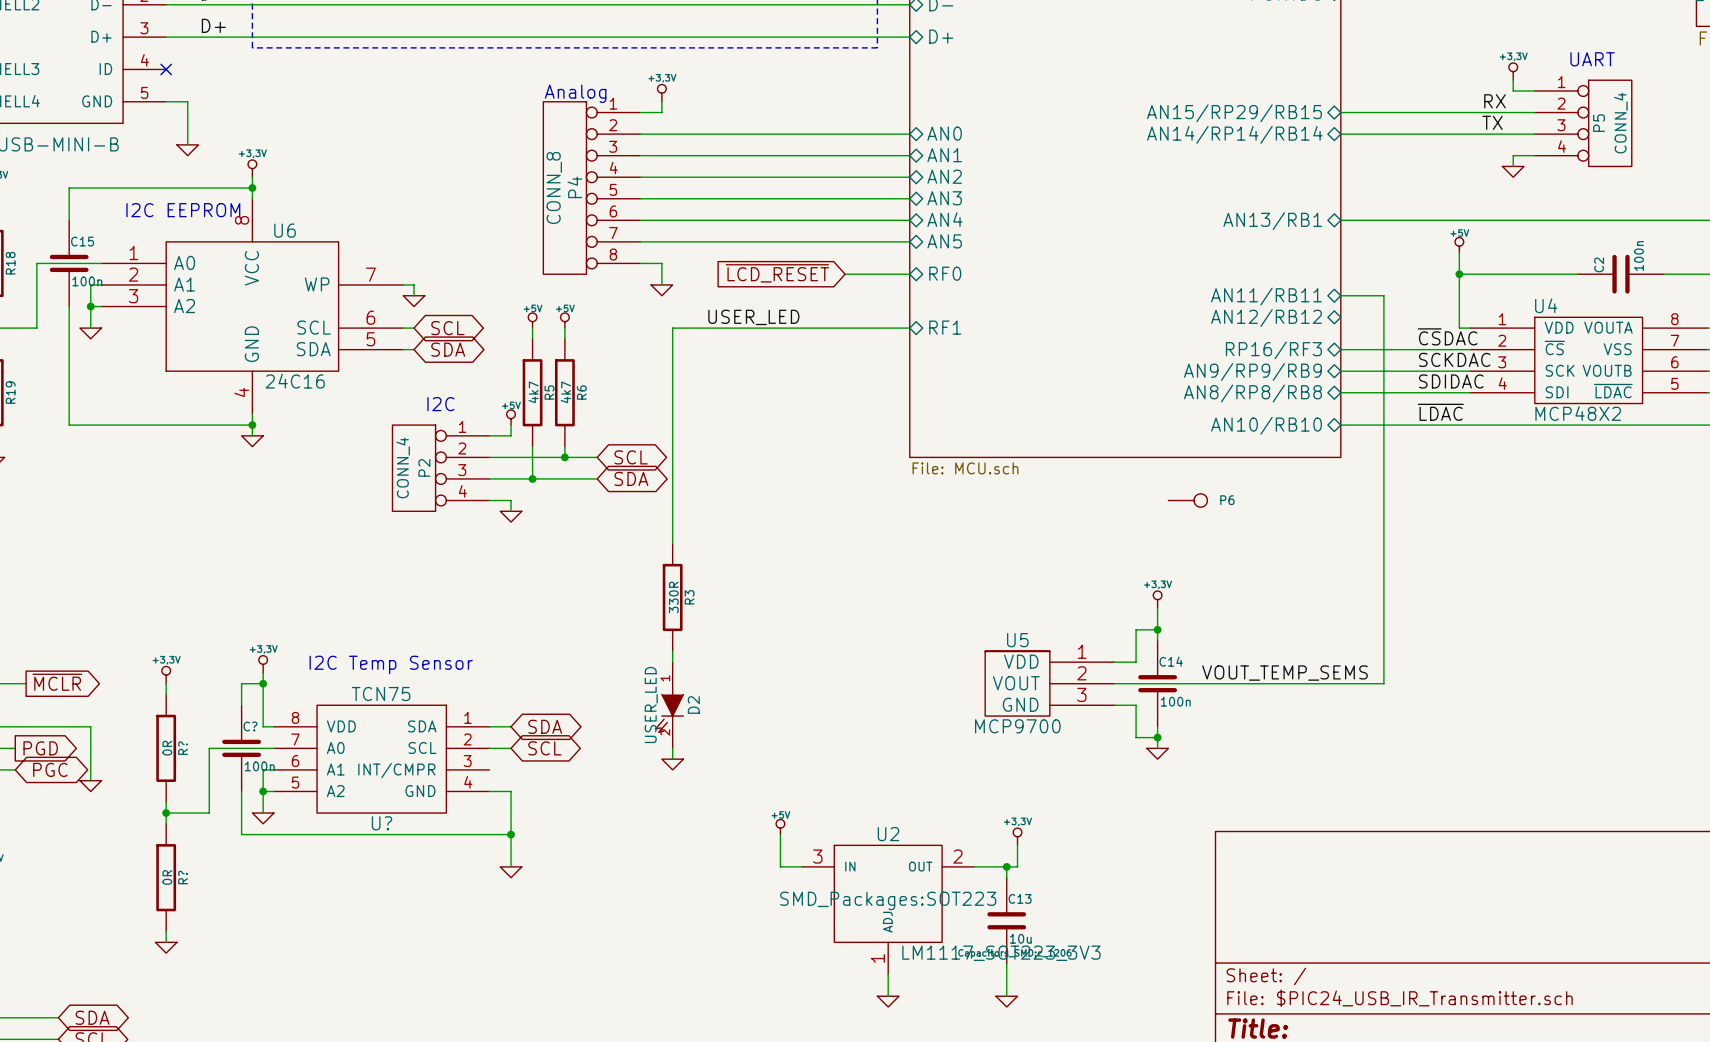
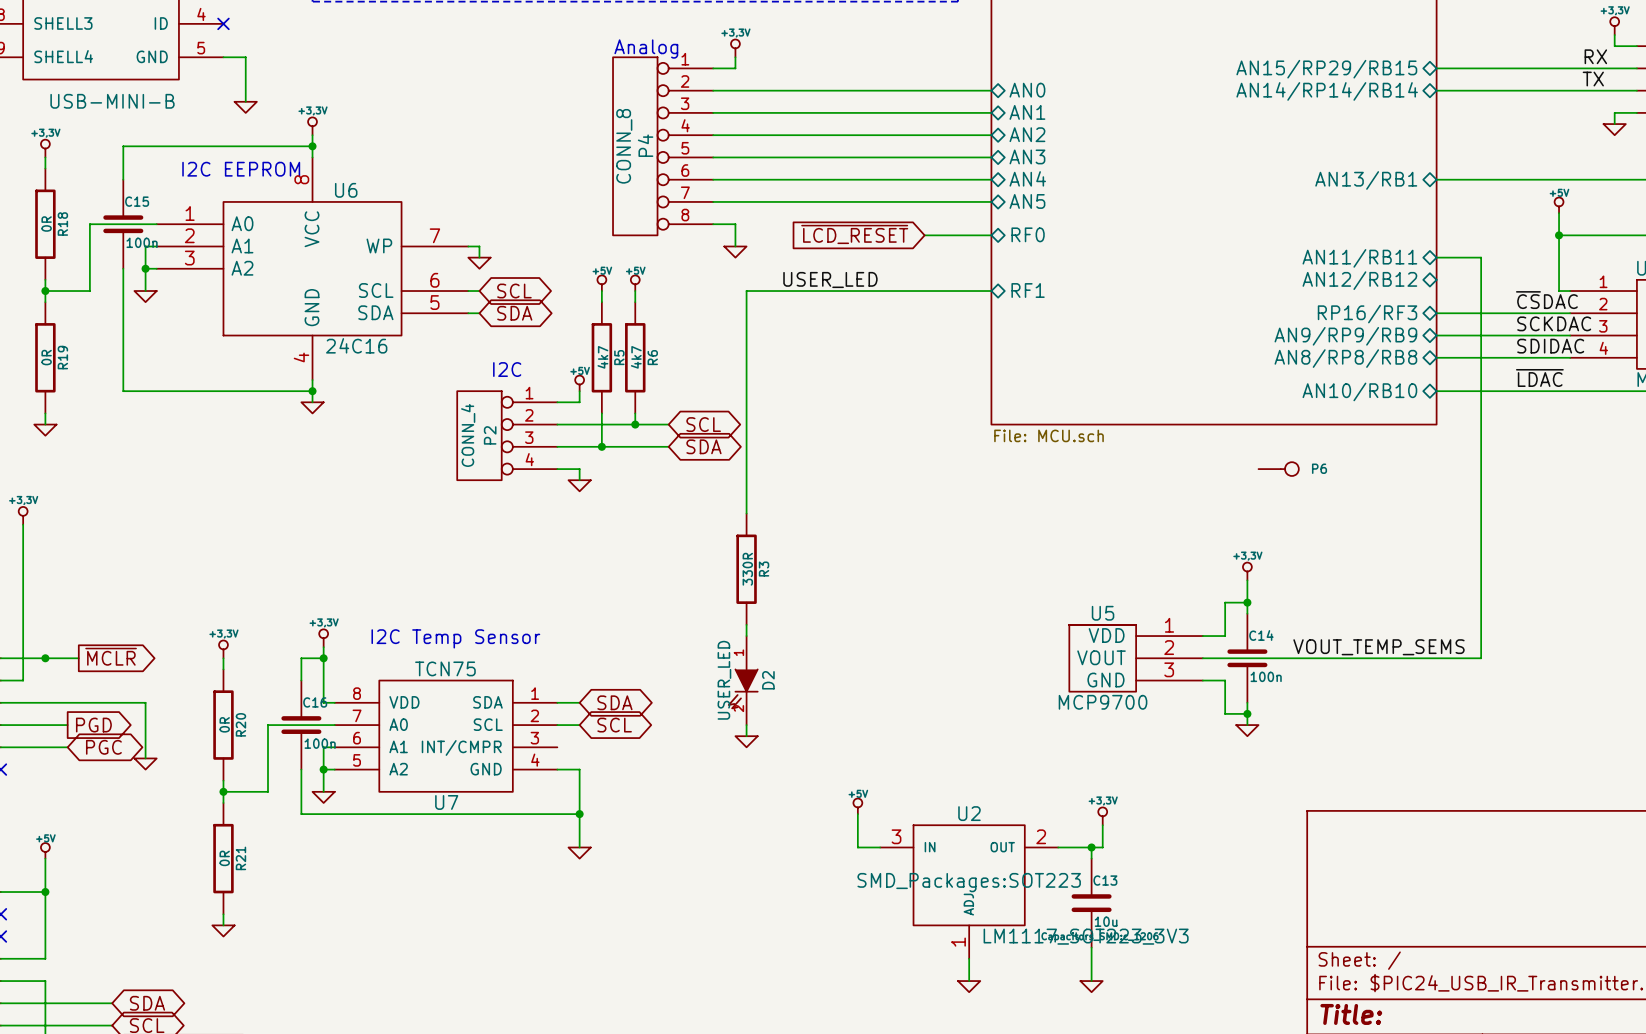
C? name: C? (250, 726) -> C16 (315, 702)
R? name: R? (183, 748) -> R20 (240, 724)
U? name: U? (382, 823) -> U7 (446, 802)
R? name: R? (183, 877) -> R21 (240, 858)

